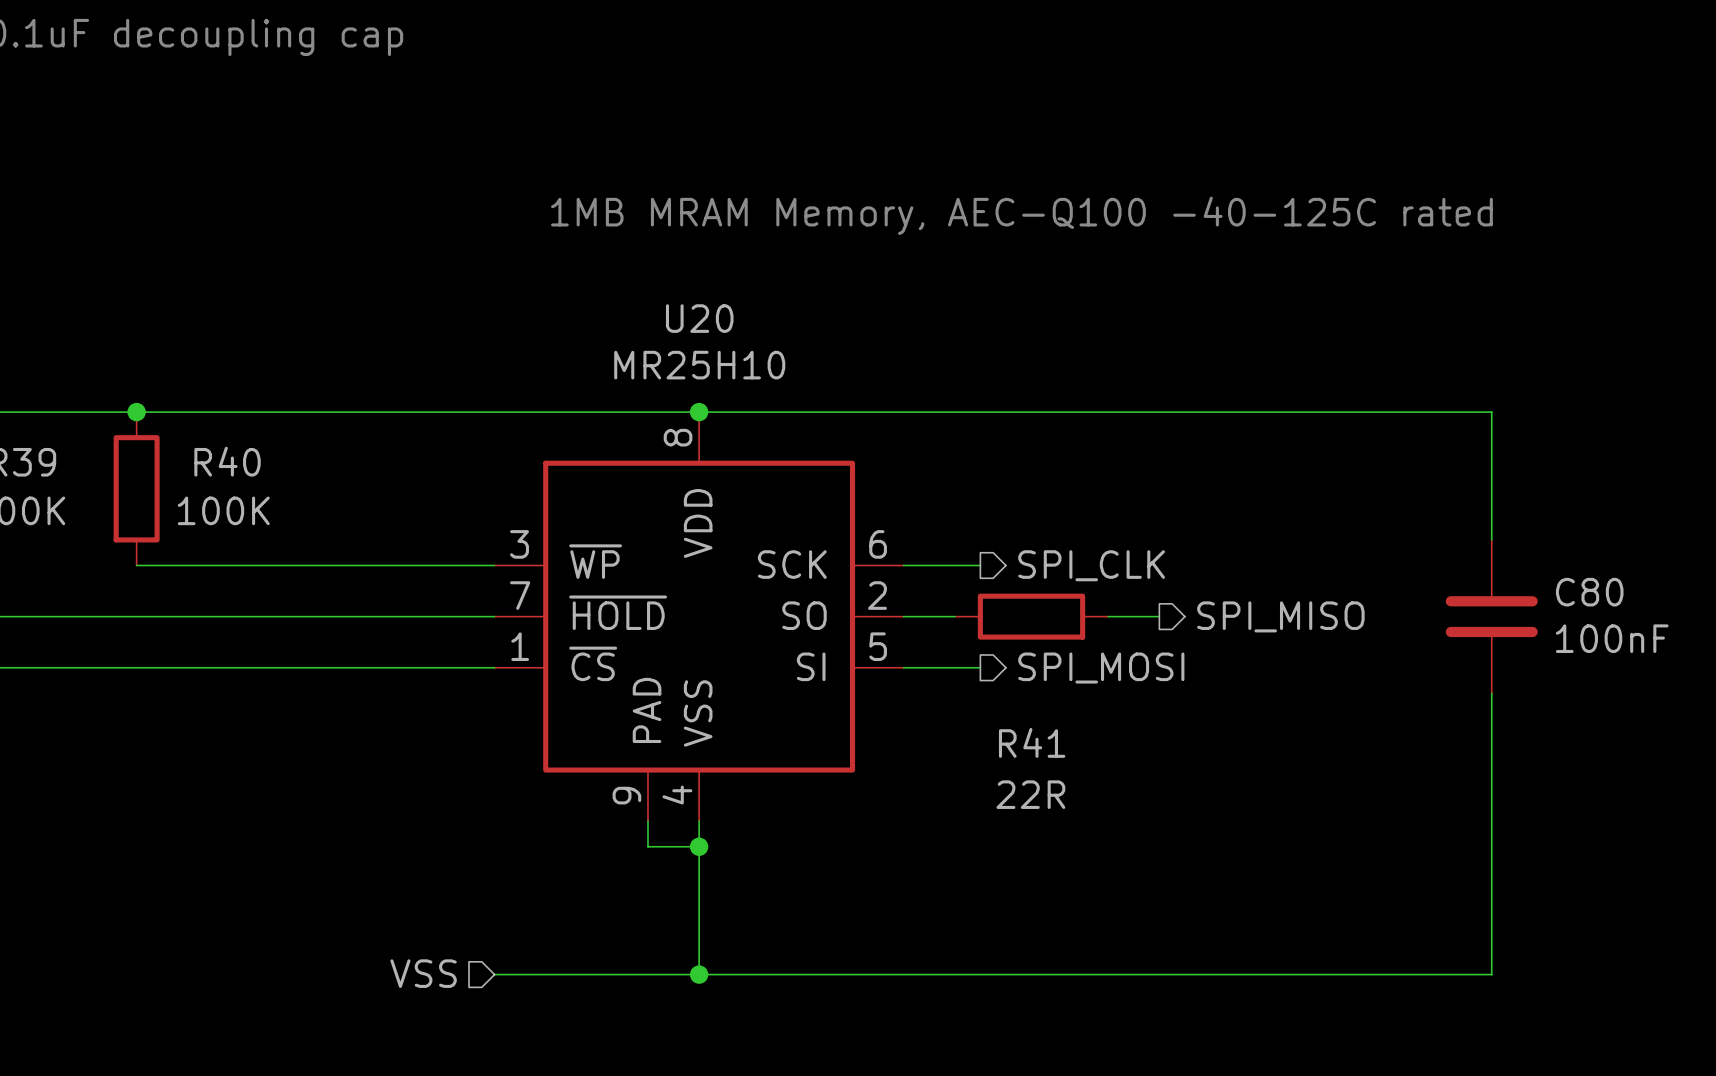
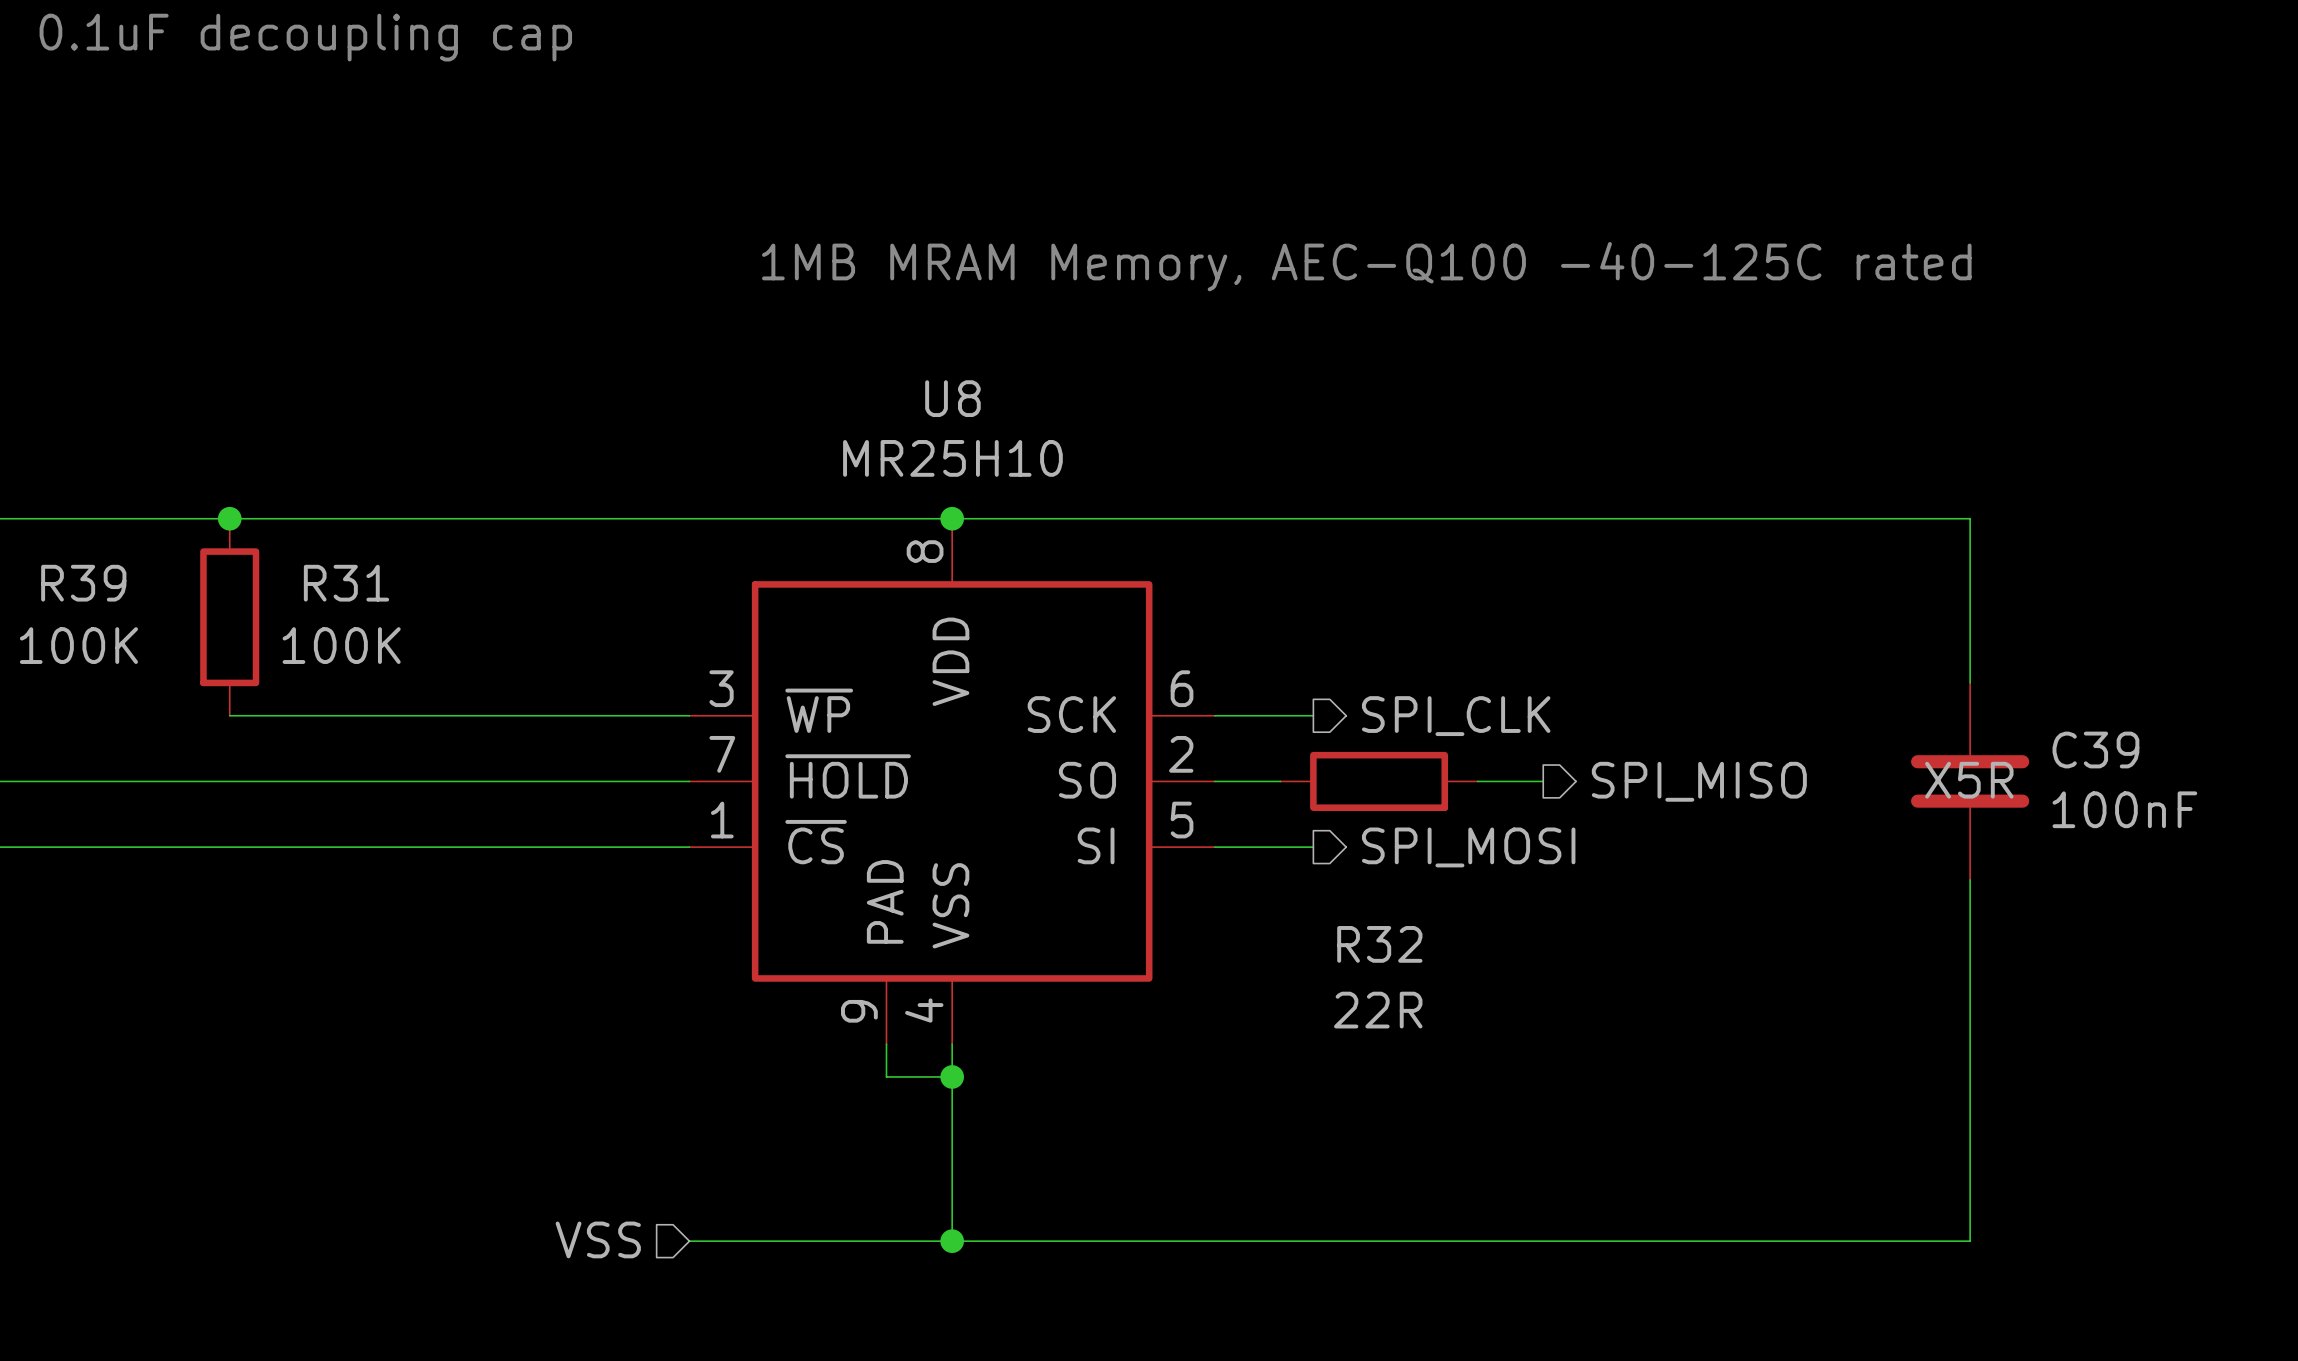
U20 name: U20 (699, 318) -> U8 (952, 398)
R40 name: R40 (227, 461) -> R31 (346, 583)
C80 name: C80 (1589, 592) -> C39 (2095, 750)
C80 text: none -> X5R (1969, 780)
R41 name: R41 (1032, 742) -> R32 (1379, 944)

